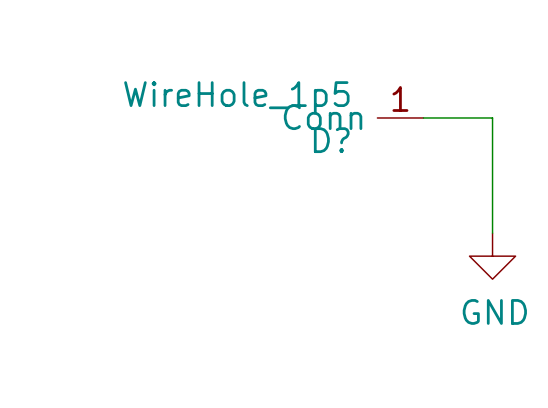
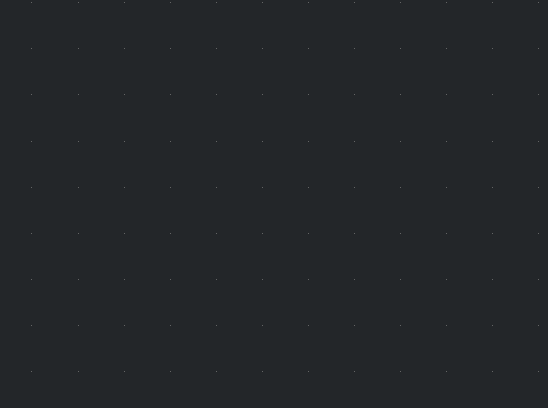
D?: WireHole_1p5 (400, 117) -> none
wire: (423, 117) (492, 117) (492, 233) -> none
power symbol: GND (492, 256) -> none

